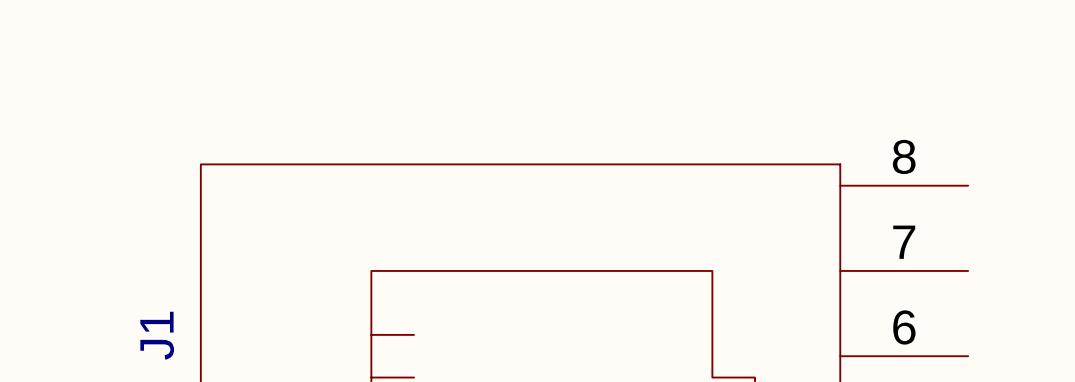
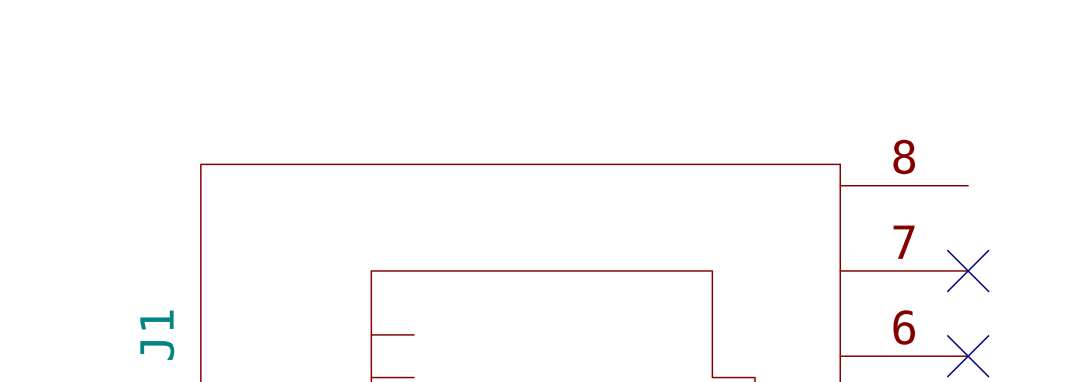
no-connect mark: none -> (968, 270)
no-connect mark: none -> (968, 356)

